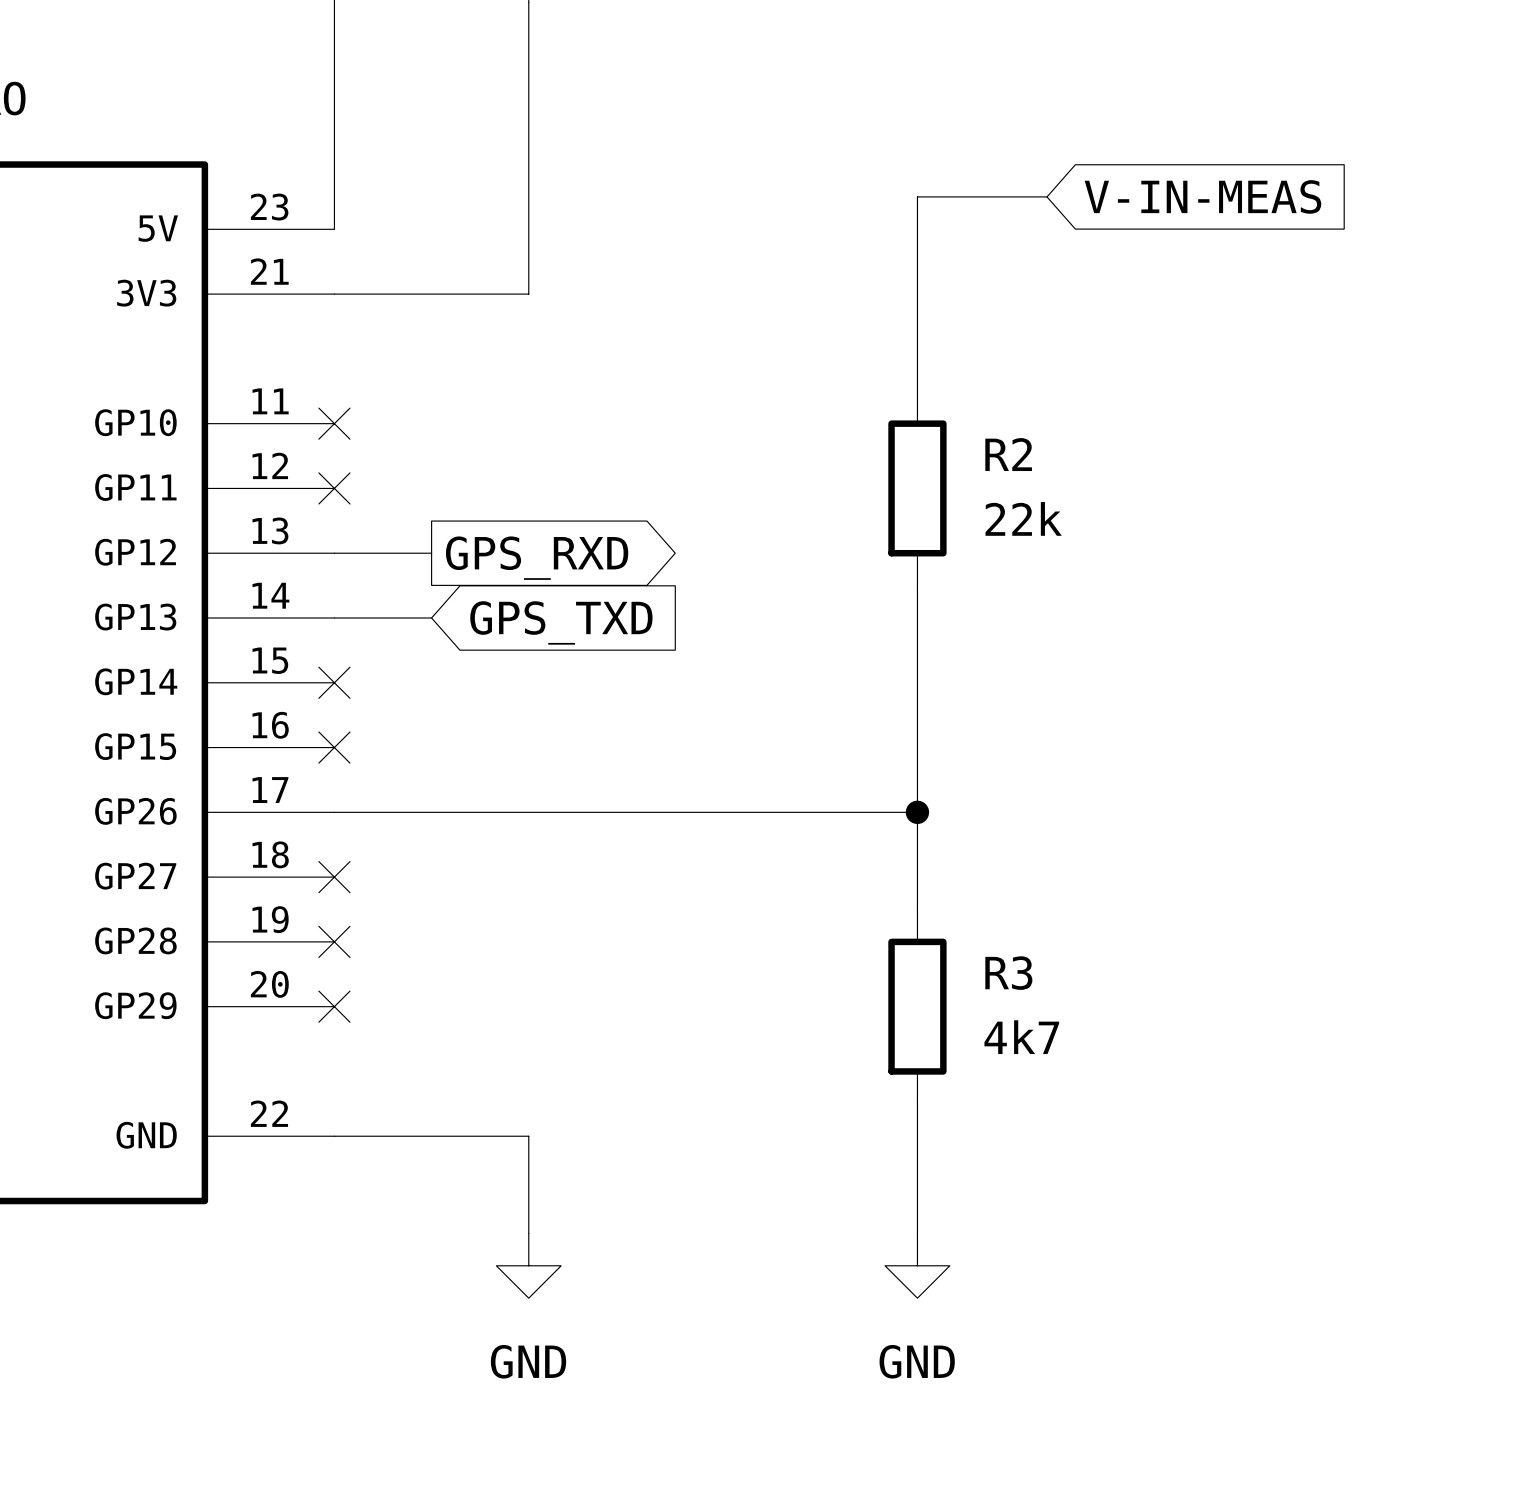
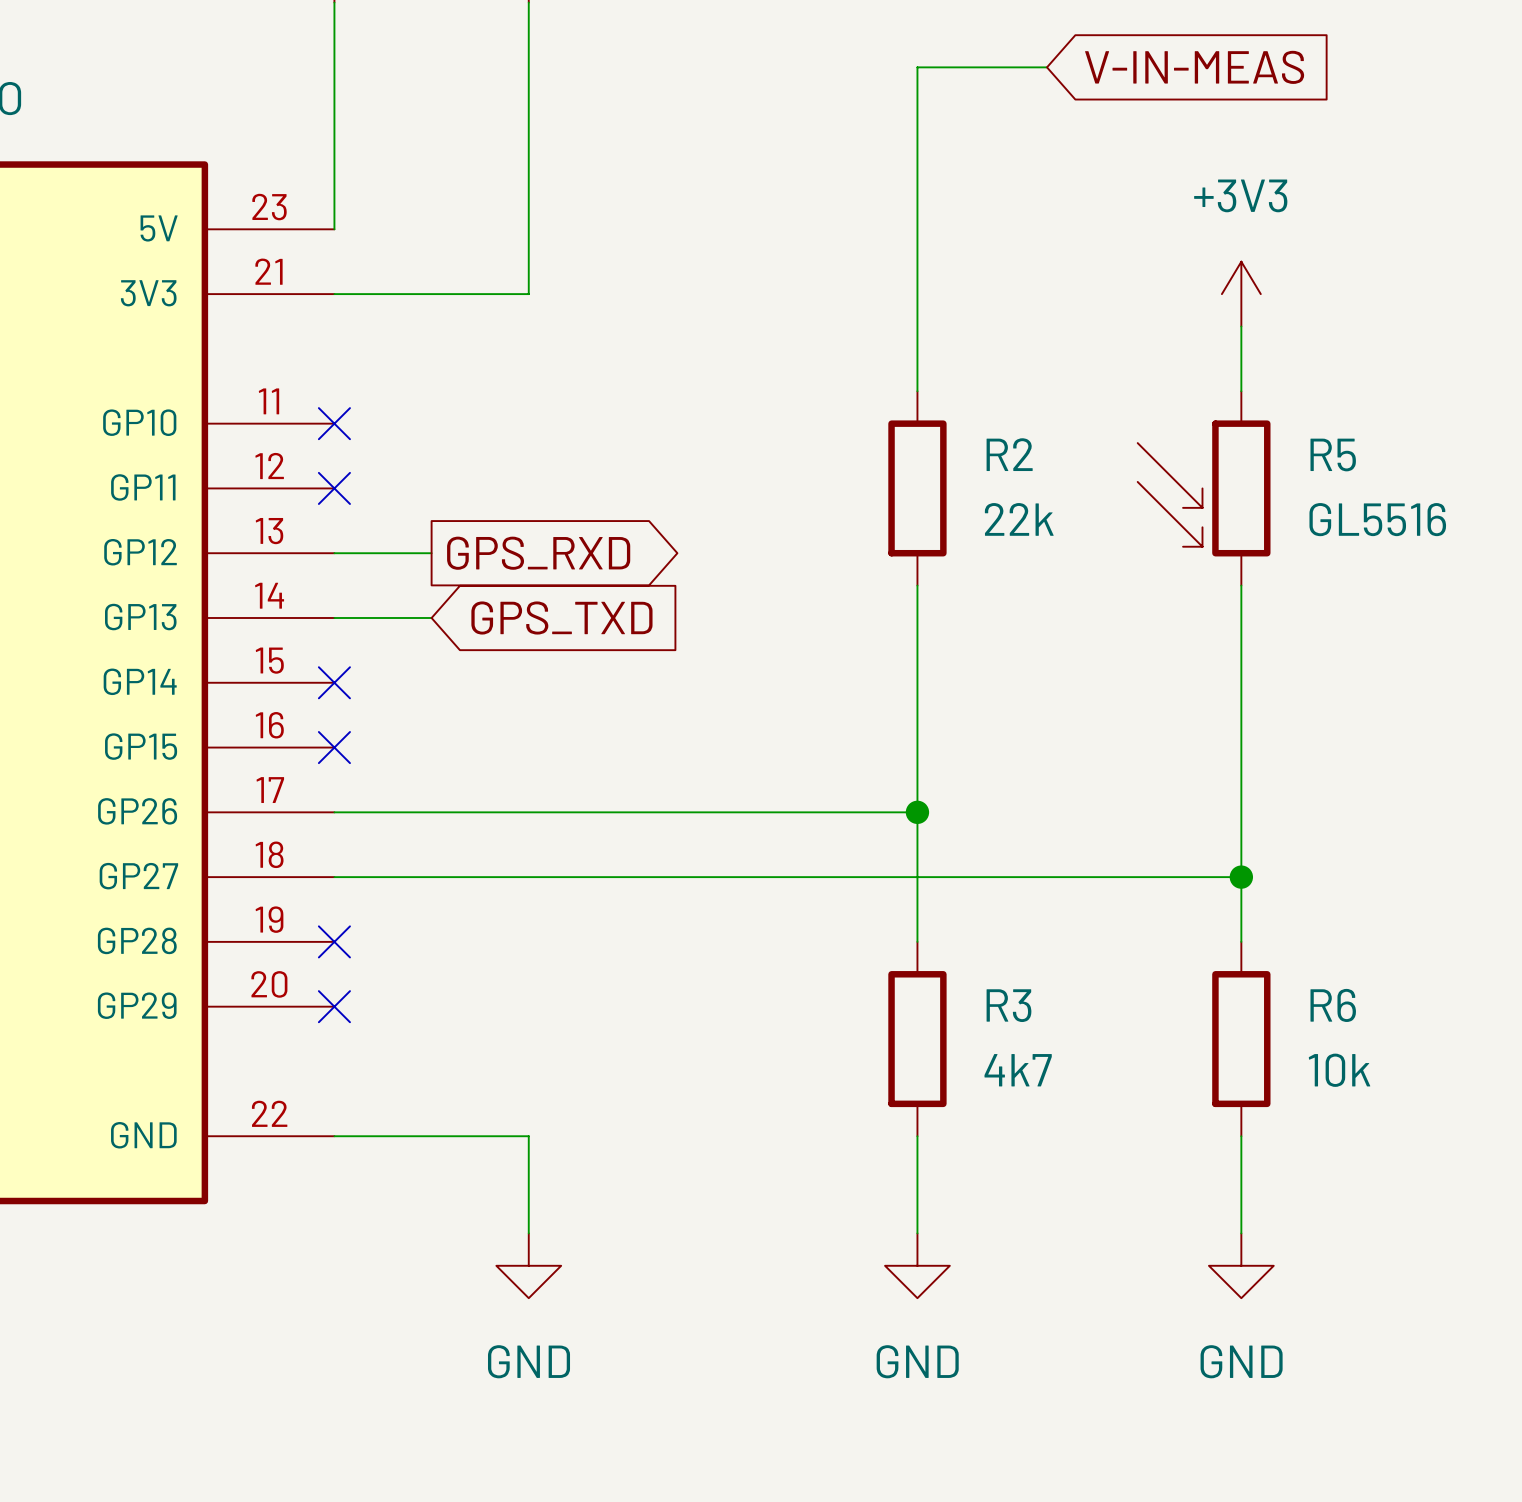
wire: (917, 196) (1047, 196) -> (917, 196) (917, 67) (1047, 67)
global label position: V-IN-MEAS (1202, 196) -> V-IN-MEAS (1194, 67)
power symbol: none -> +3V3 (1241, 294)
wire: none -> (1241, 326) (1241, 391)
R5: none -> GL5516 (1204, 488)
wire: none -> (1241, 585) (1241, 941)
wire: none -> (334, 877) (1241, 877)
no-connect mark: (334, 877) -> none
junction: none -> (1241, 877)
R3 position: (917, 1006) -> (917, 1039)
R6: none -> 10k (1241, 1039)
wire: none -> (1241, 1136) (1241, 1233)
power symbol: none -> GND (1241, 1265)

